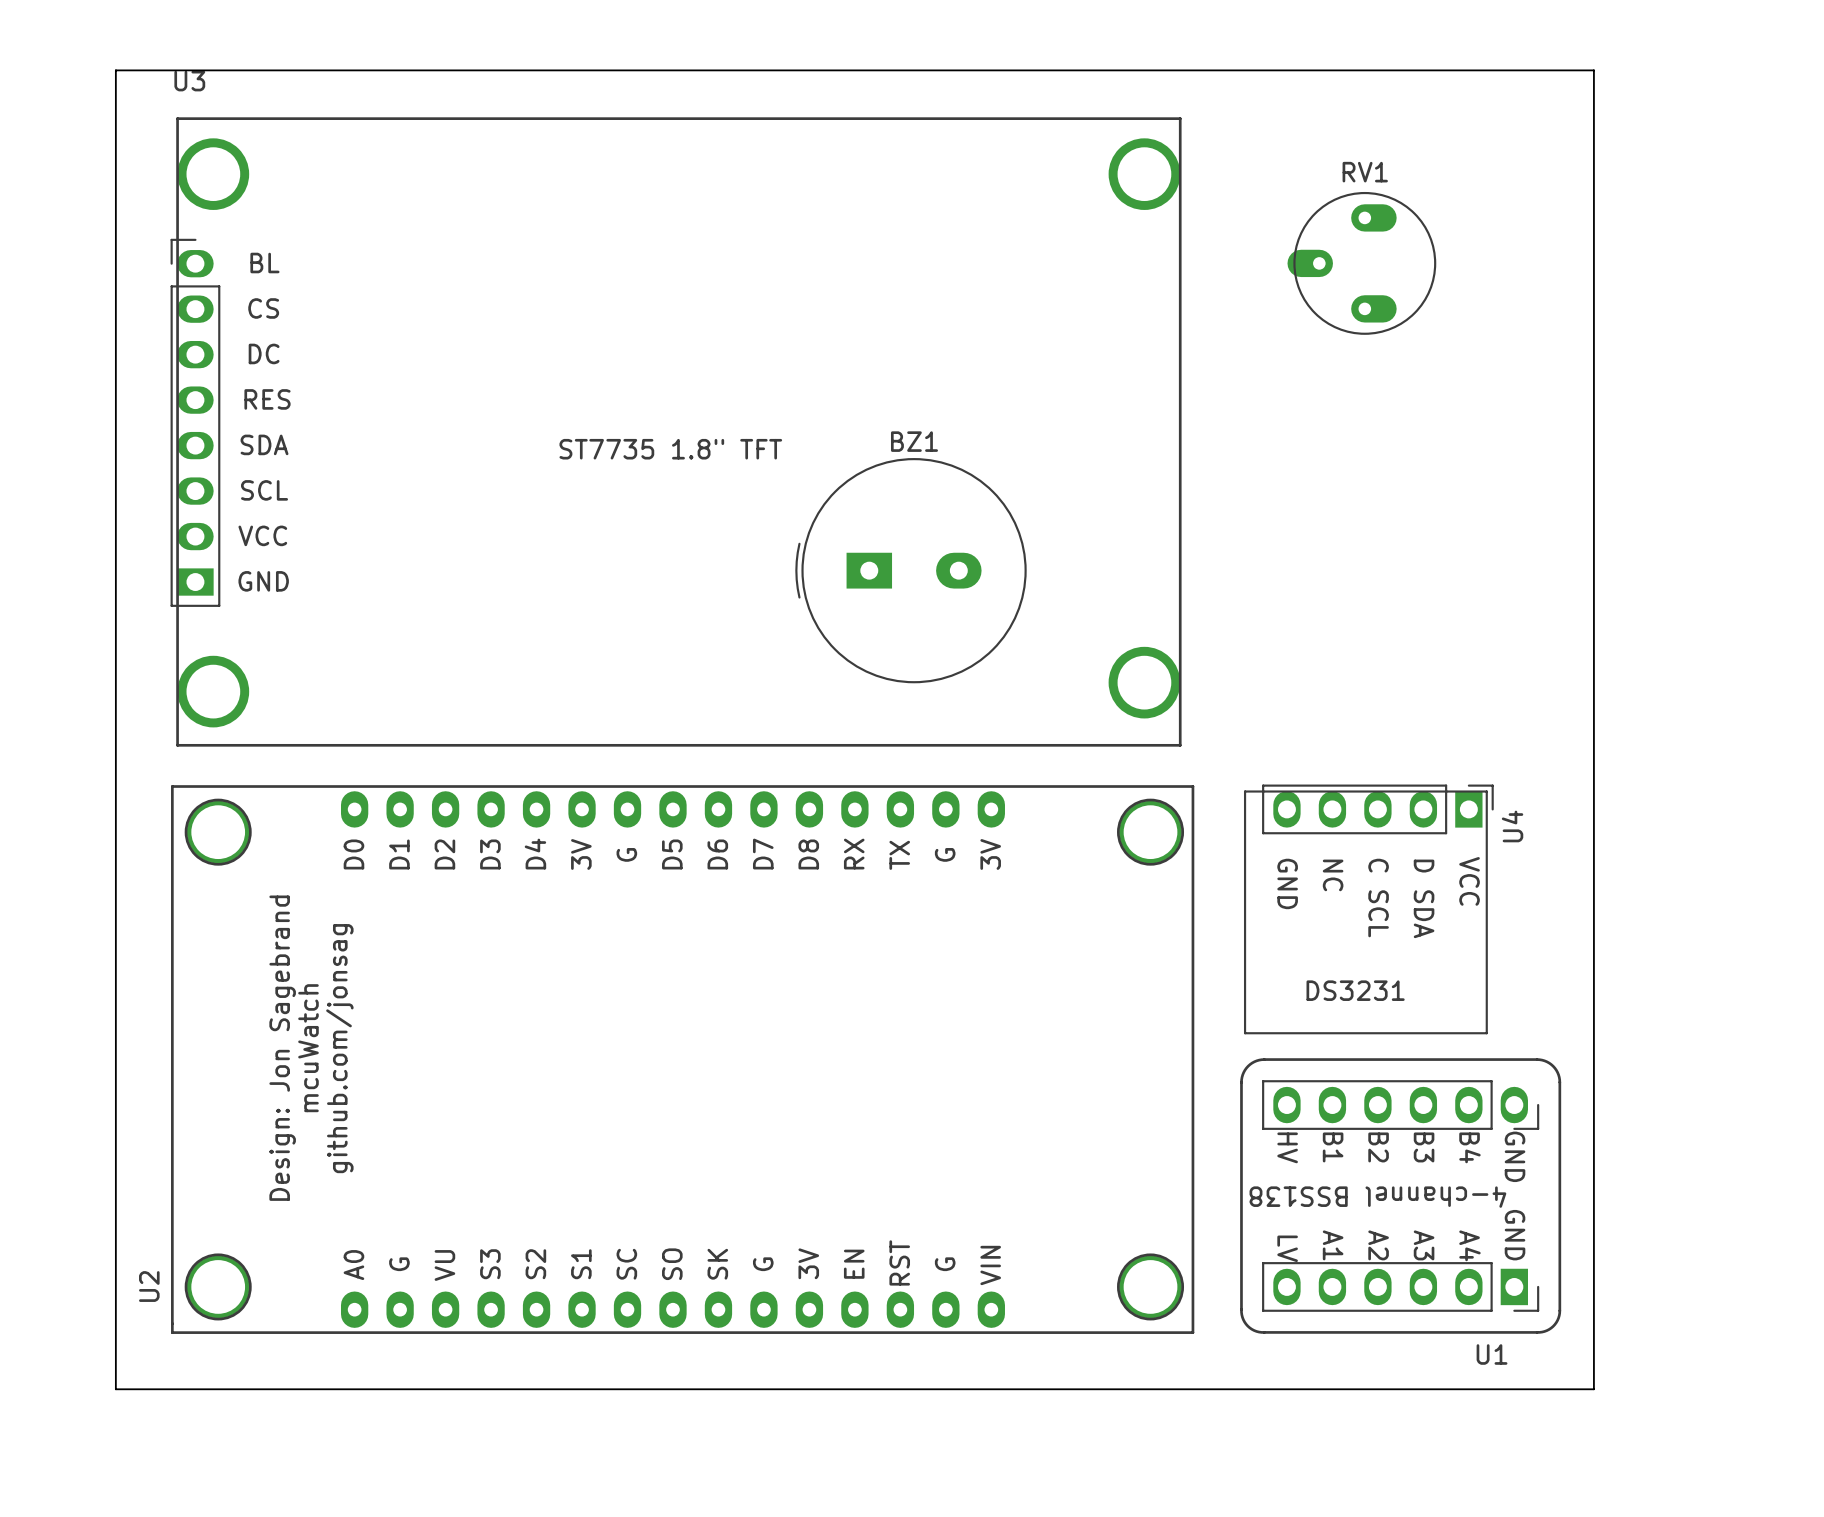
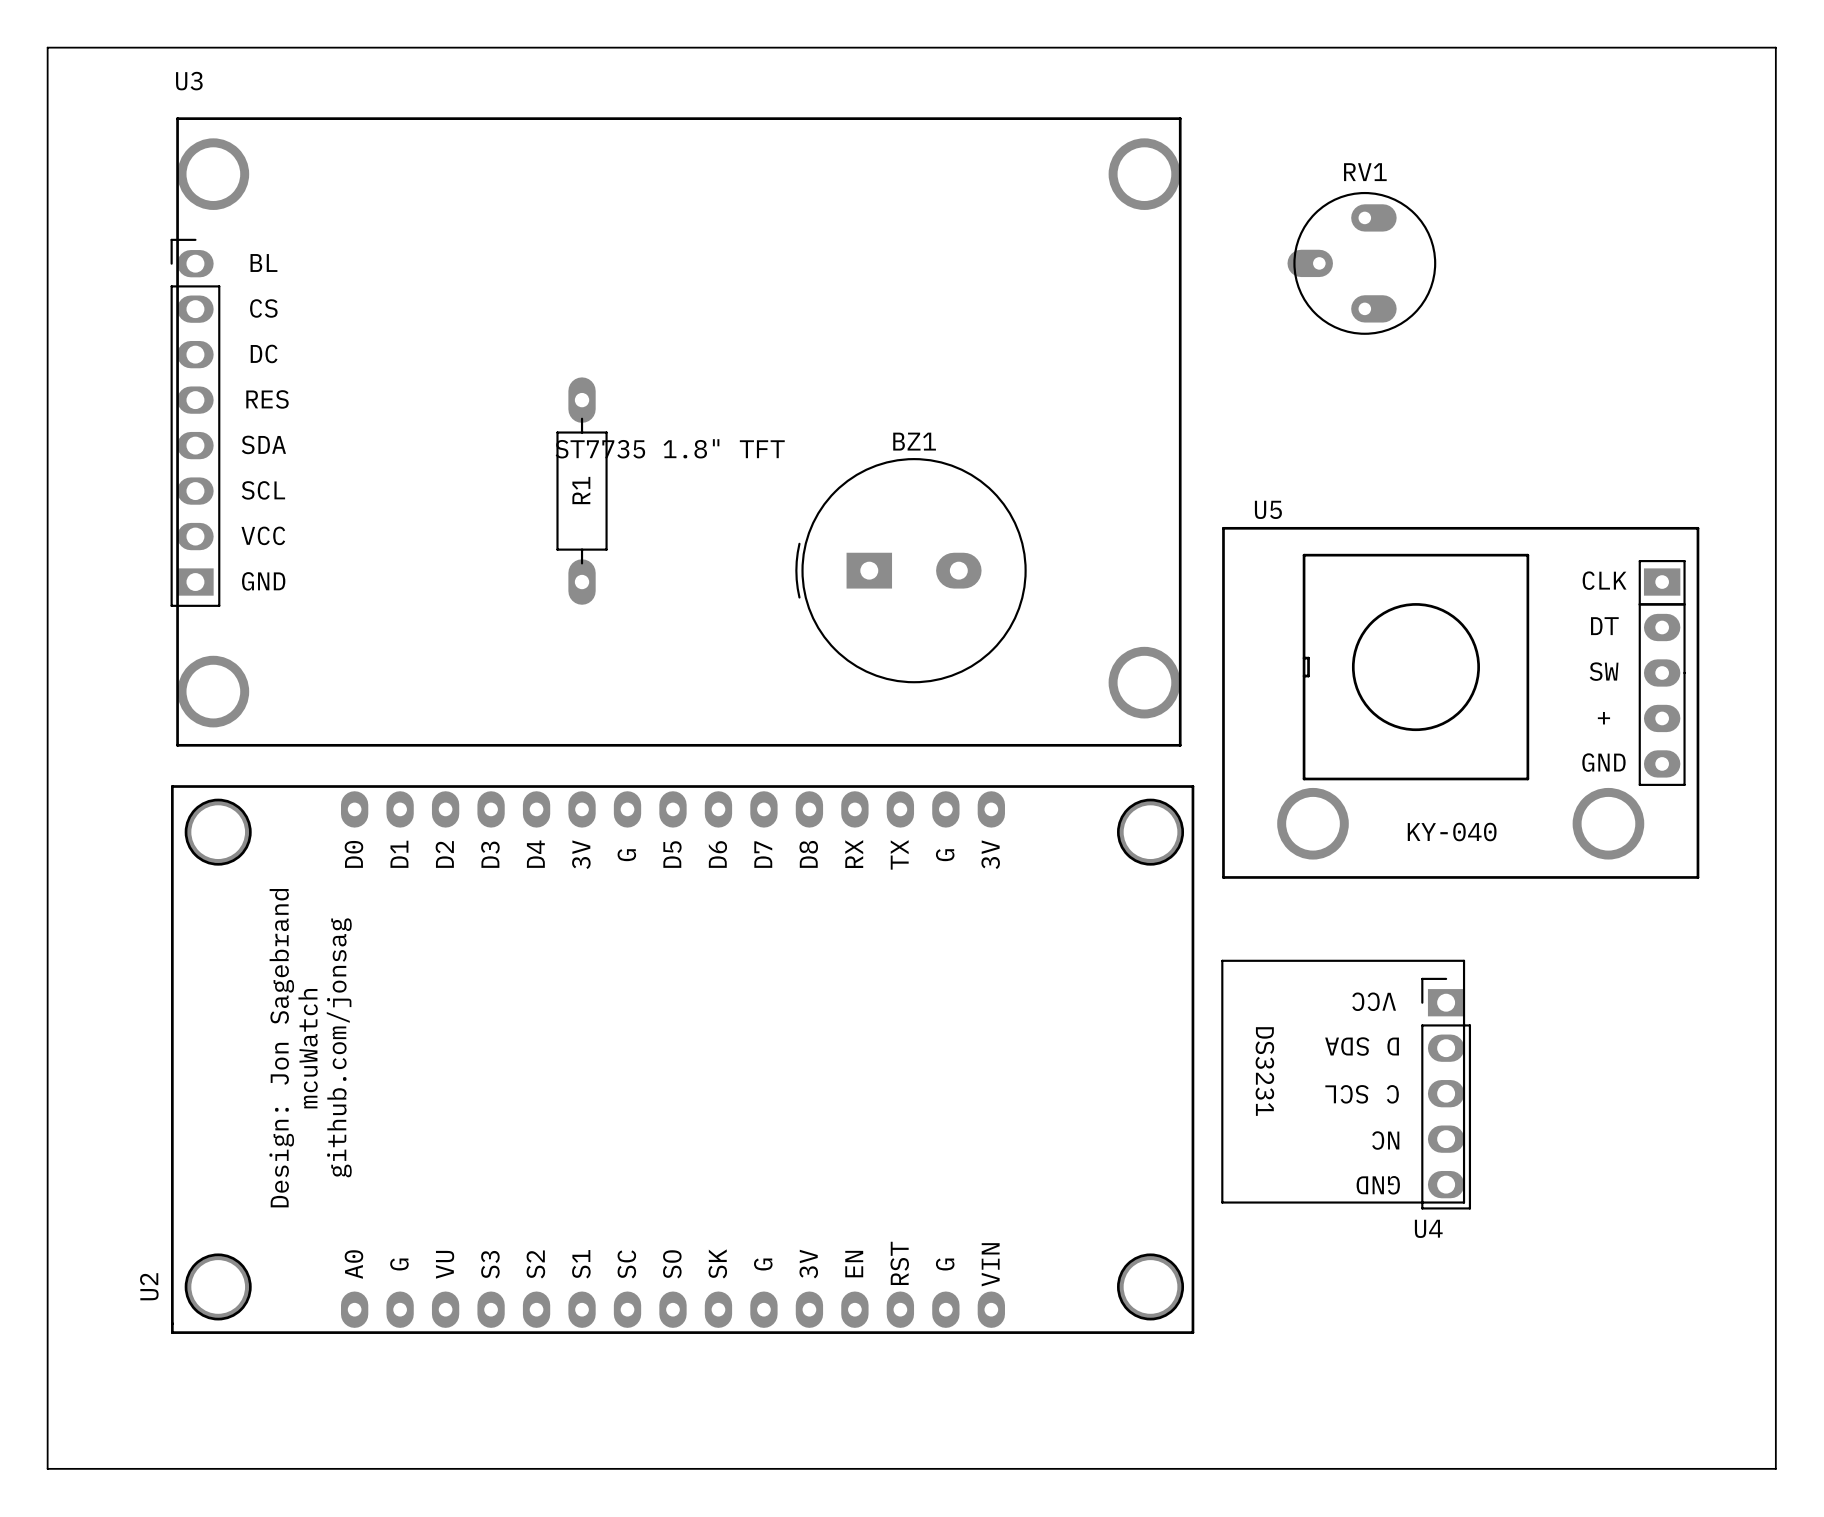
board edge: (115, 70) (1593, 70) (1593, 1389) (115, 1389) (115, 70) -> (47, 47) (47, 1468) (1775, 1468) (1775, 47) (47, 47)
R1: none -> (582, 491)
U5: none -> (1460, 702)
U4 footprint: [1243, 784, 1494, 1035] -> [1221, 959, 1472, 1210]
U4 name position: U4 (1512, 826) -> U4 (1428, 1228)
U1: (1400, 1195) -> none

